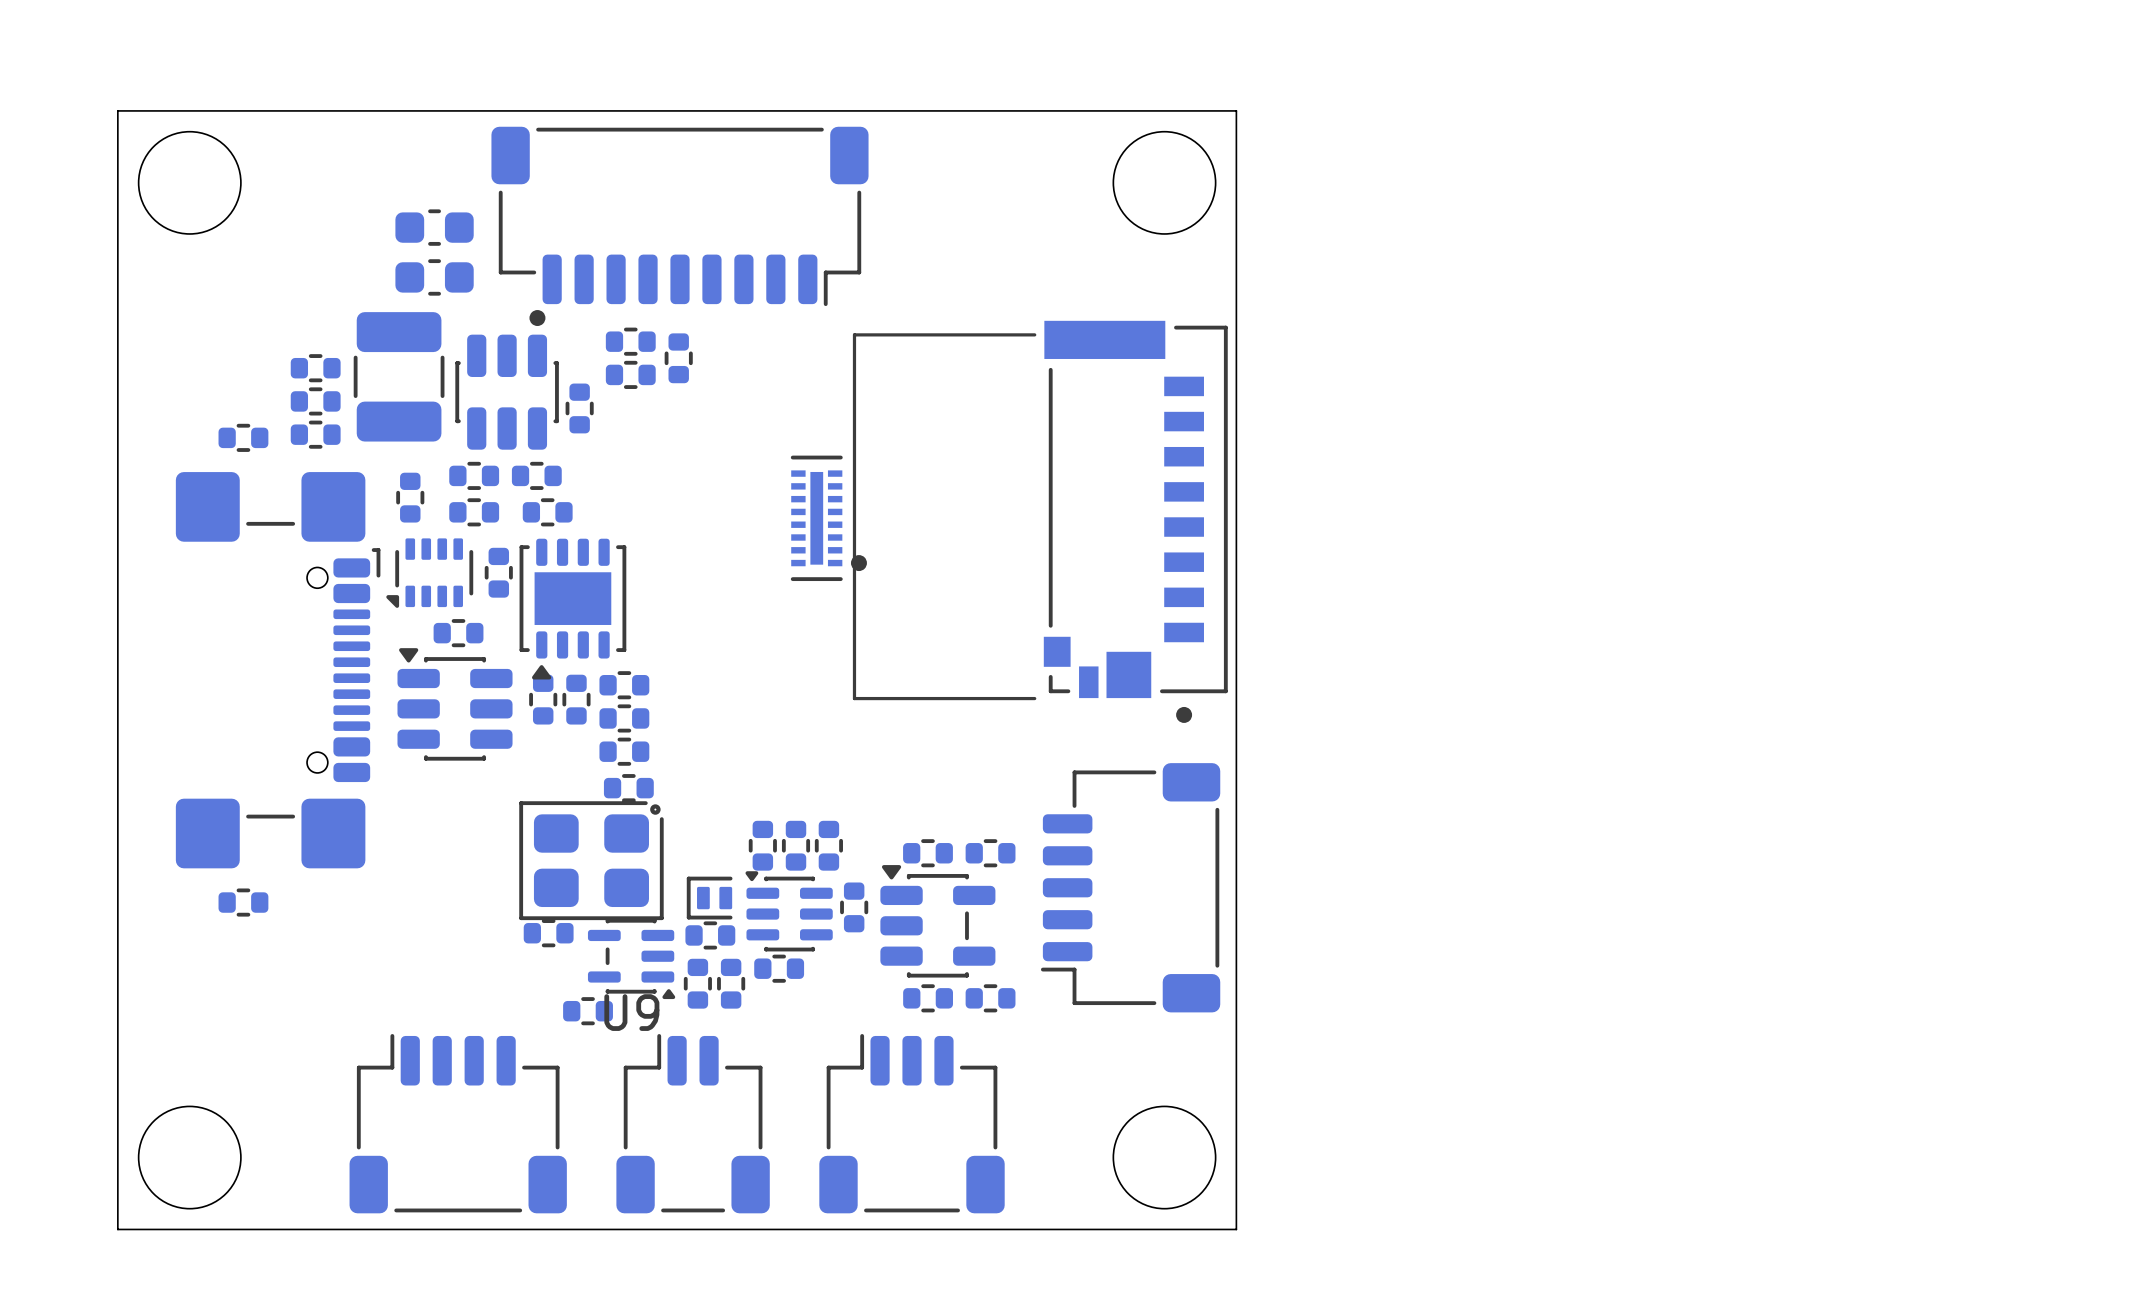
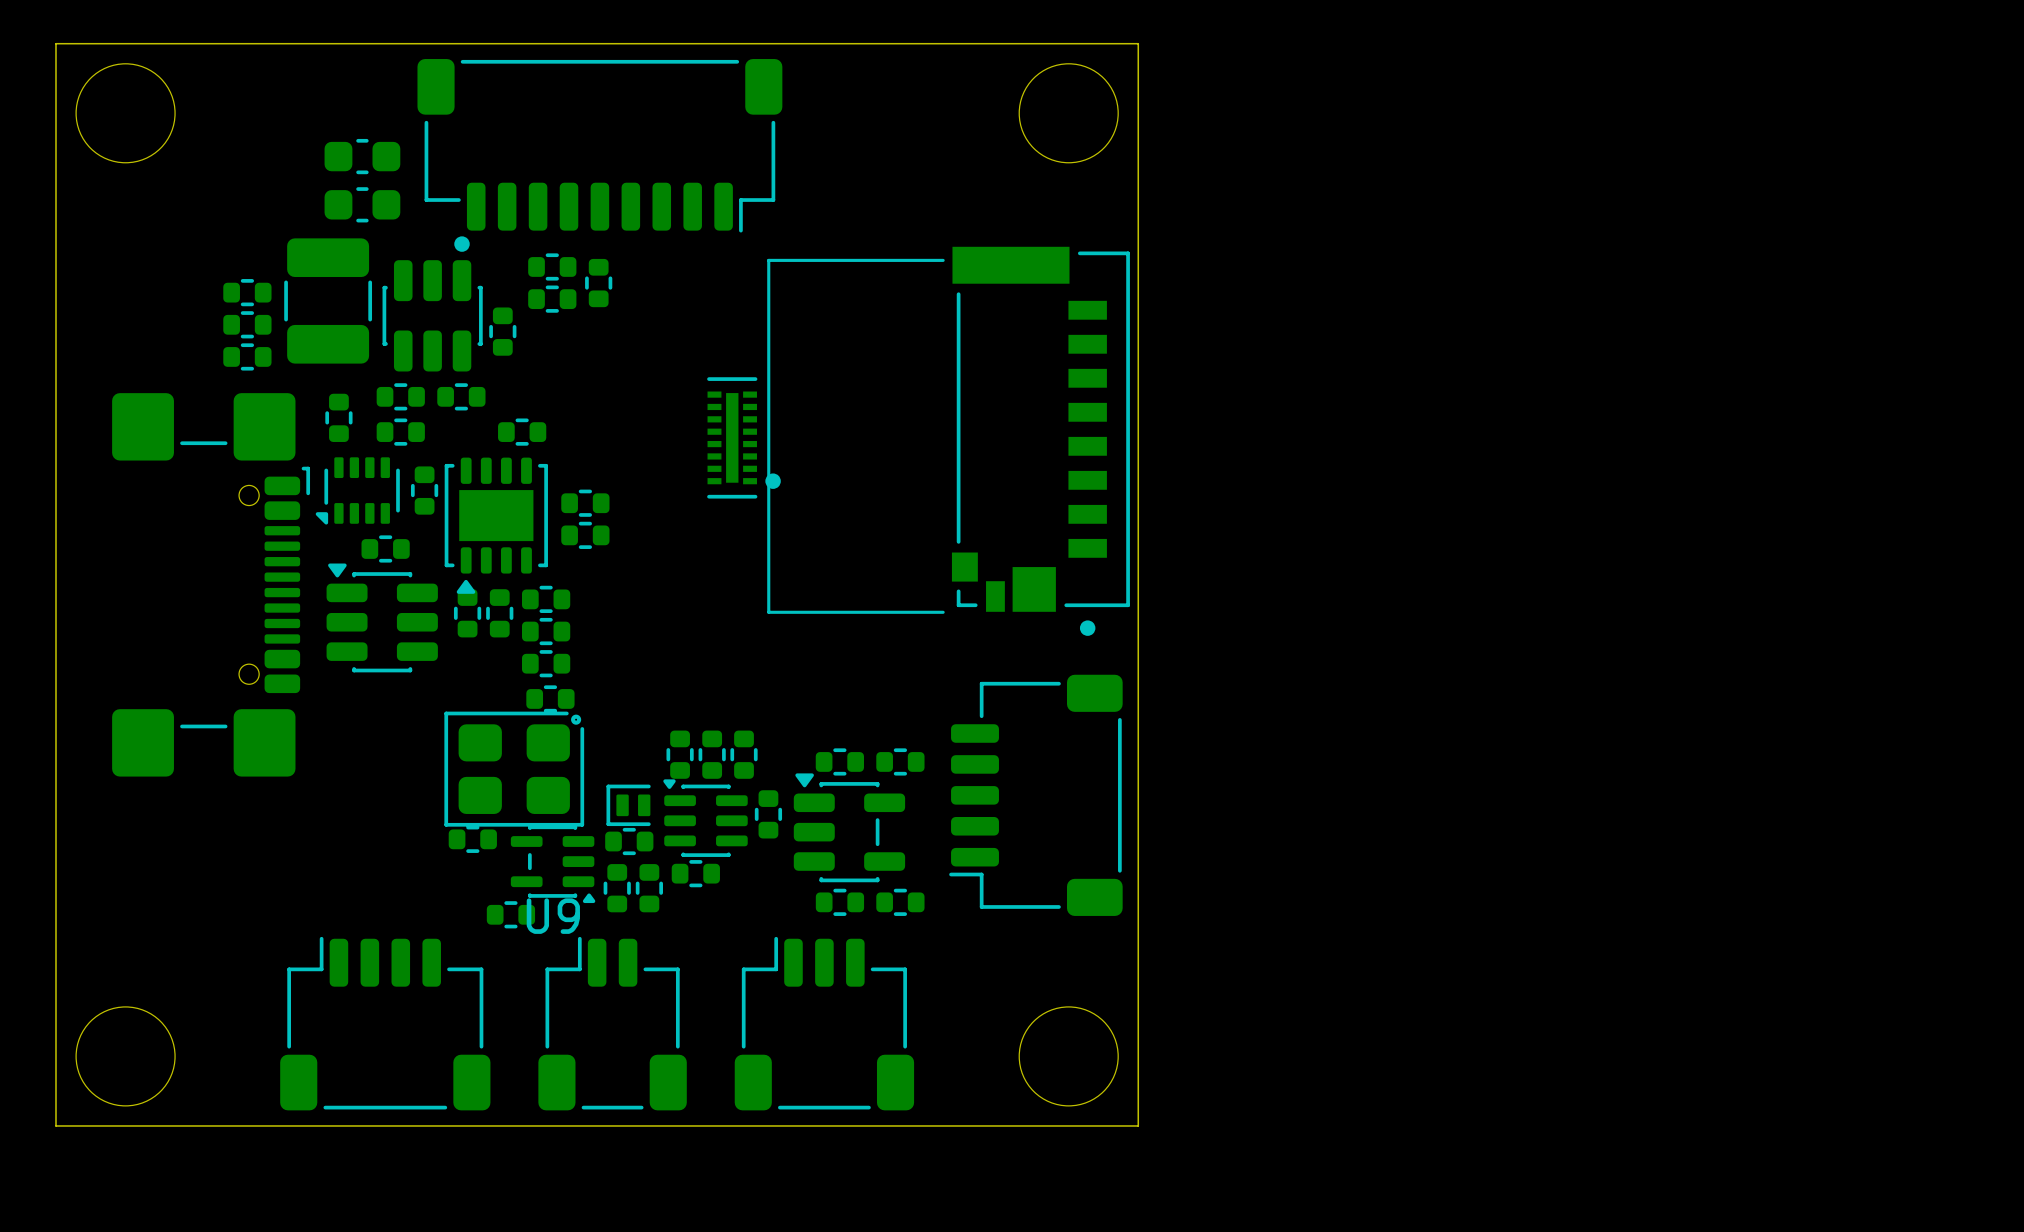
part: (243, 437) -> none
part position: (547, 512) -> (522, 432)
part: none -> (585, 503)
part: none -> (585, 535)
part: (243, 902) -> none

